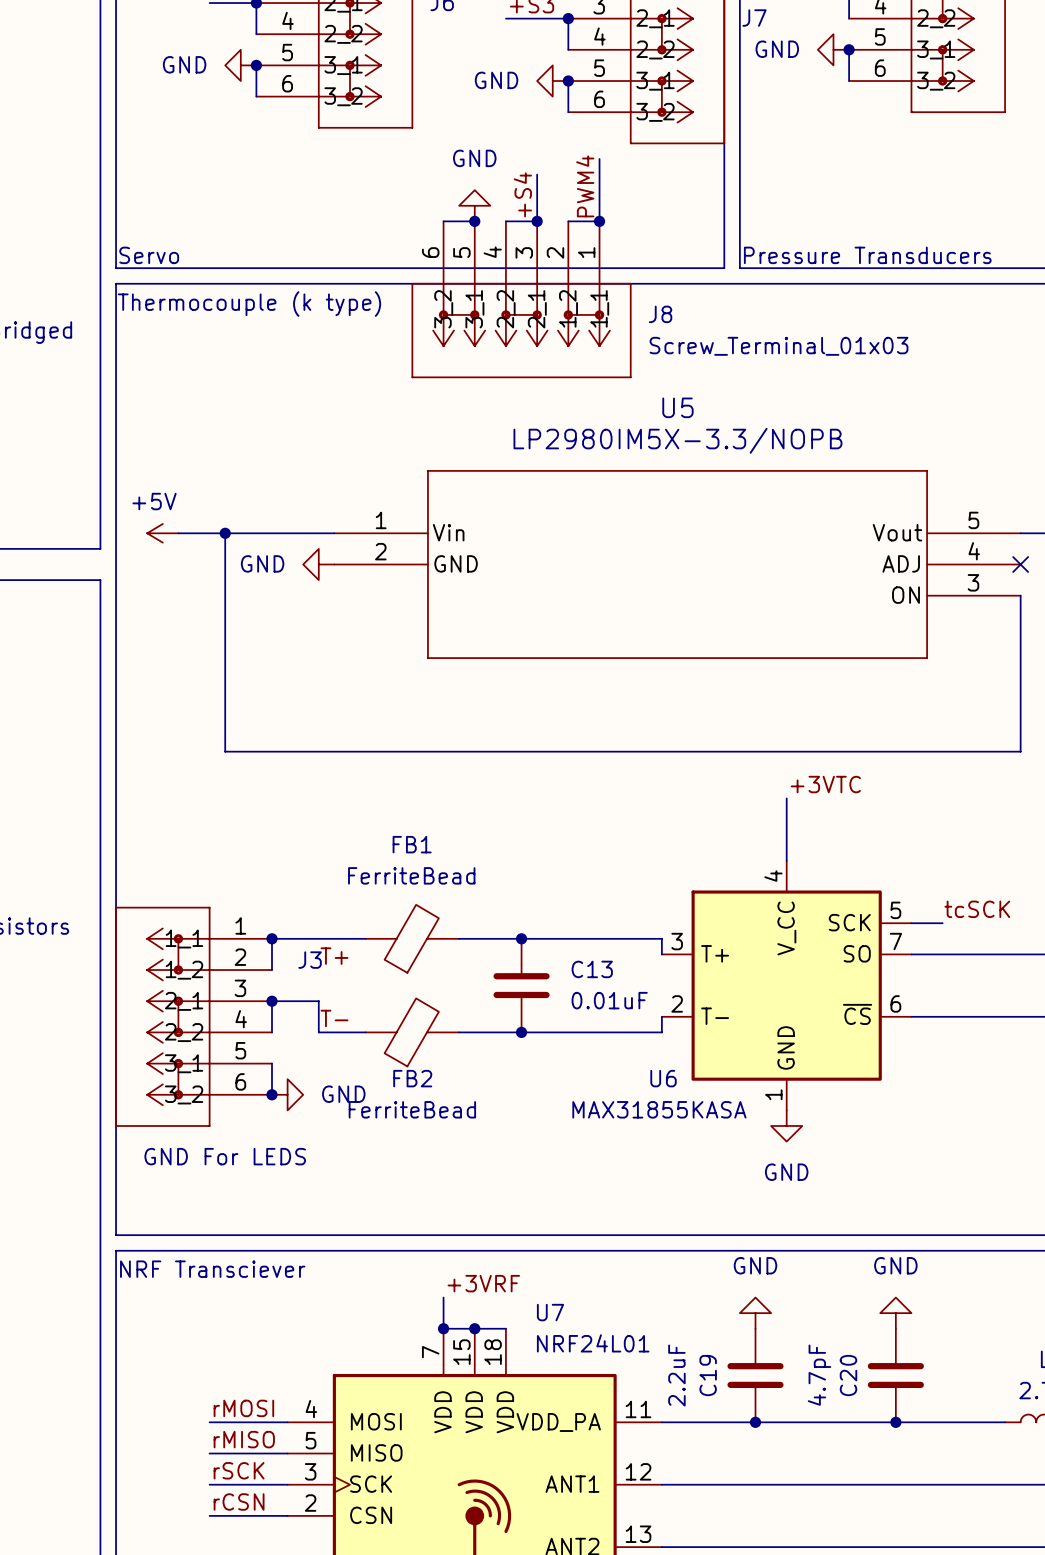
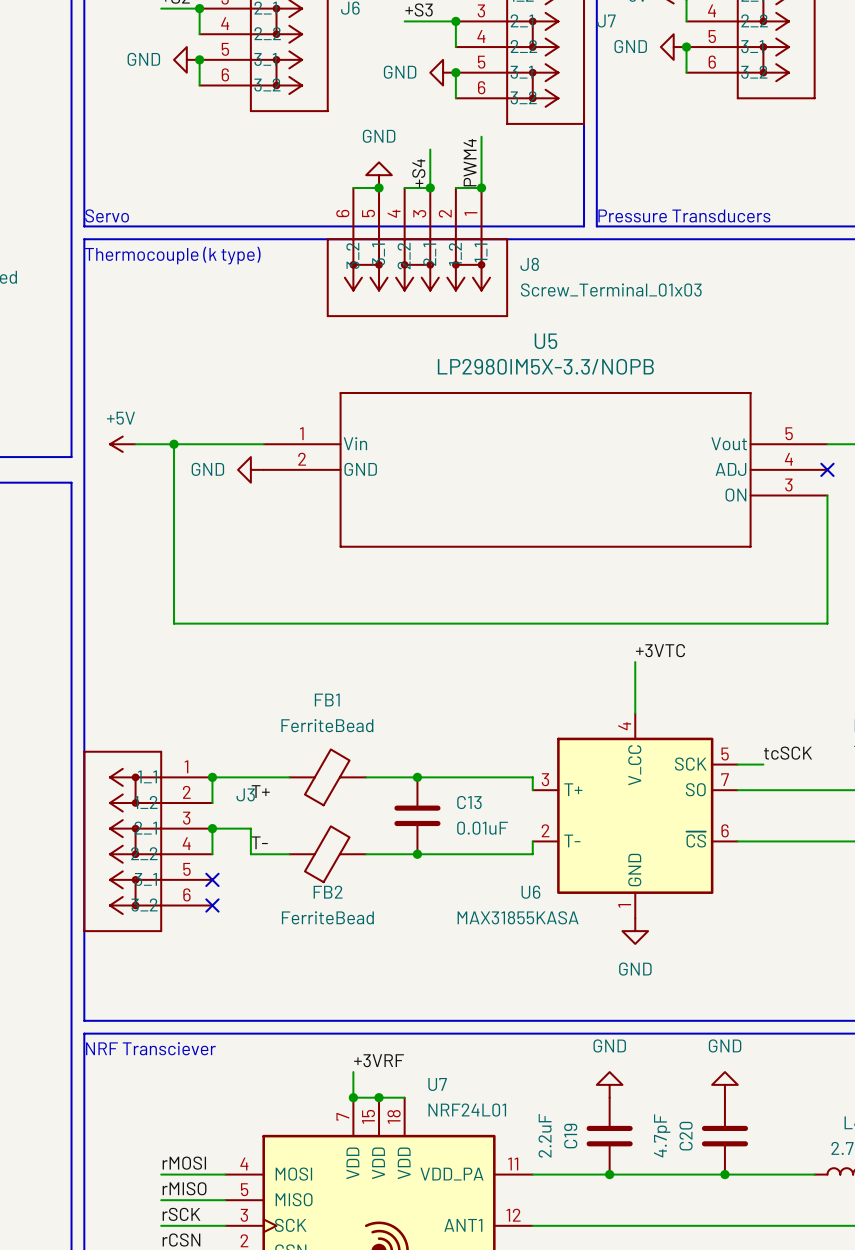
wire: (272, 1063) (272, 1094) -> none
no-connect mark: none -> (212, 879)
junction: (272, 1094) -> none
no-connect mark: none -> (212, 905)
power symbol: GND (287, 1094) -> none
text: GND For LEDS (225, 1156) -> none

